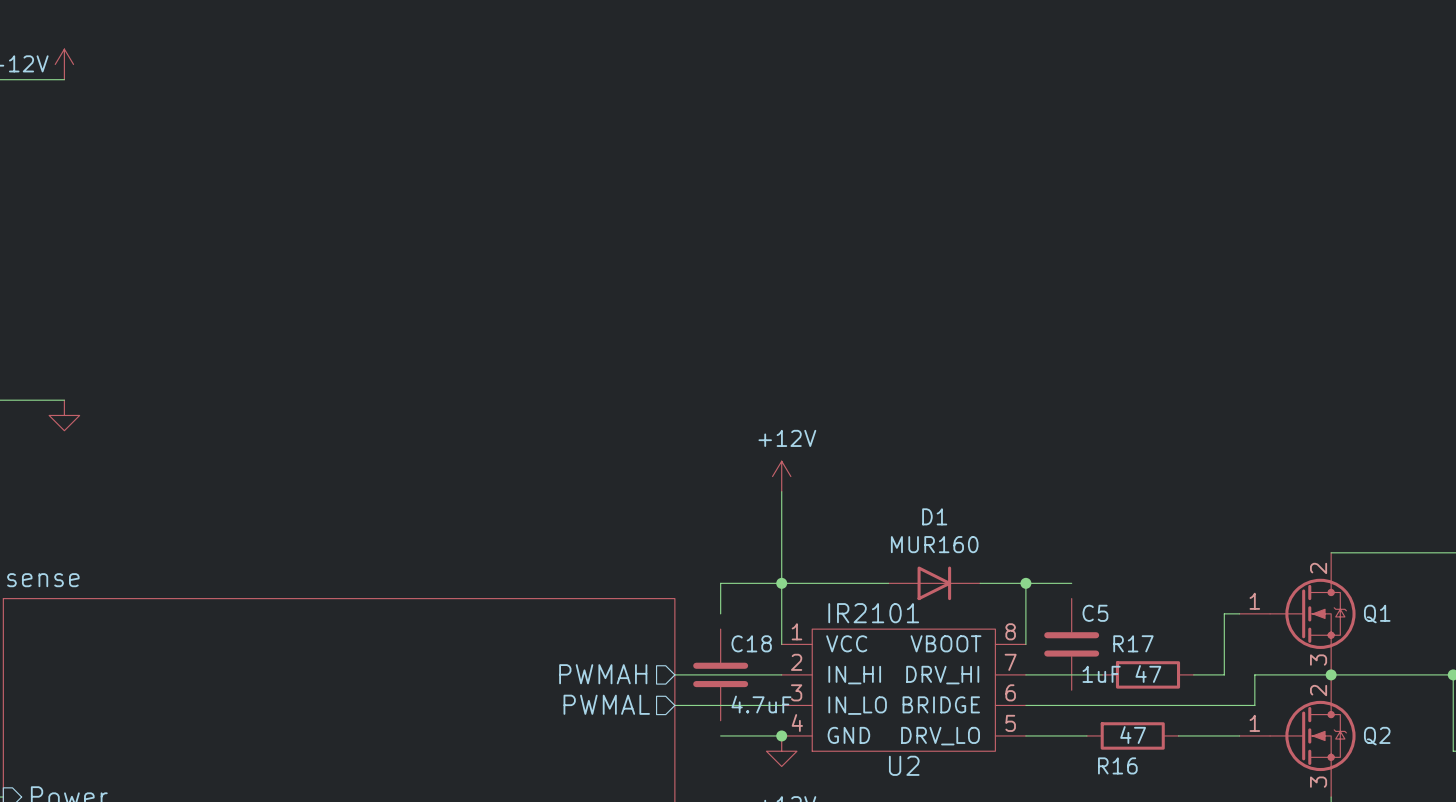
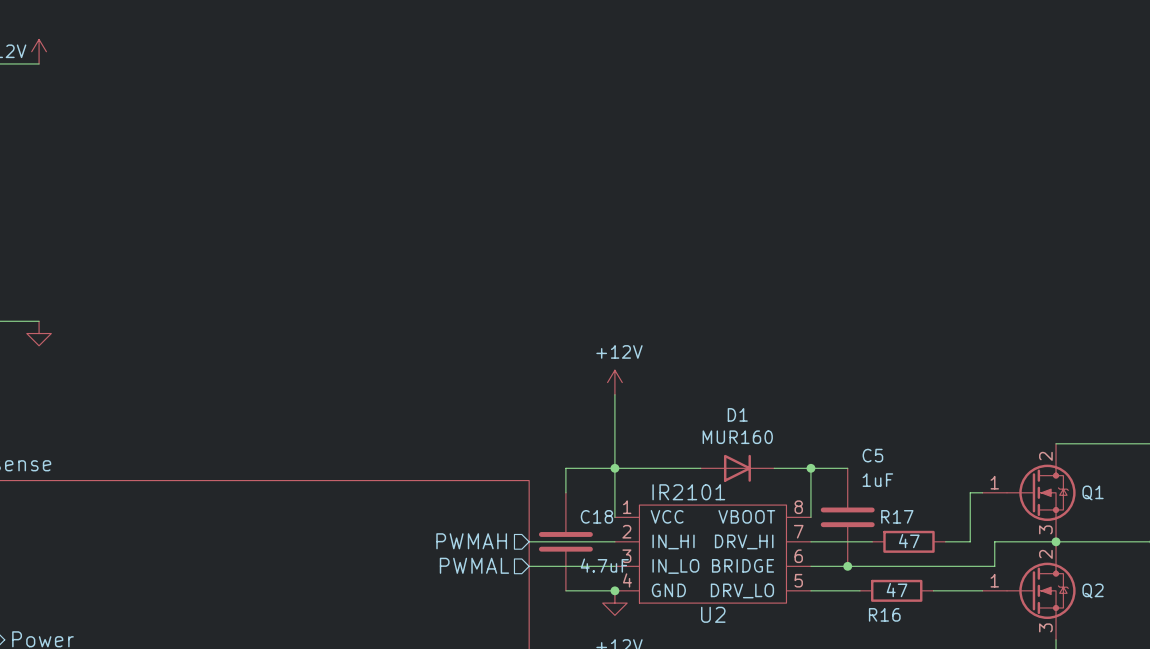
C5 symbol: [1044, 598, 1100, 691] -> [820, 468, 875, 567]
C5 name position: C5 (1095, 613) -> C5 (872, 455)
C18 symbol: [693, 629, 749, 721] -> [538, 492, 593, 591]
C5 value position: 1uF (1101, 674) -> 1uF (877, 480)
junction: none -> (847, 566)

